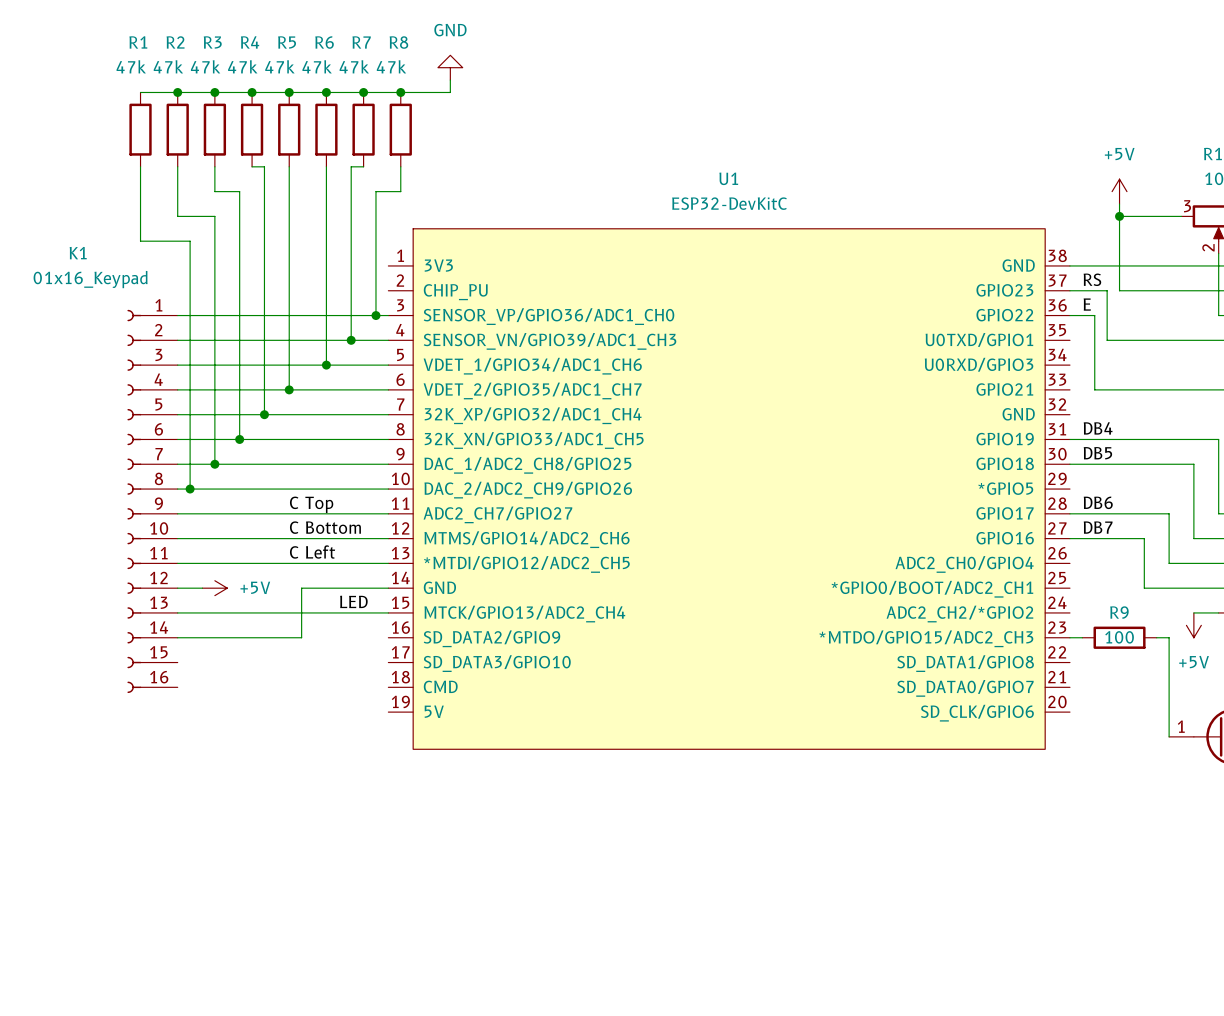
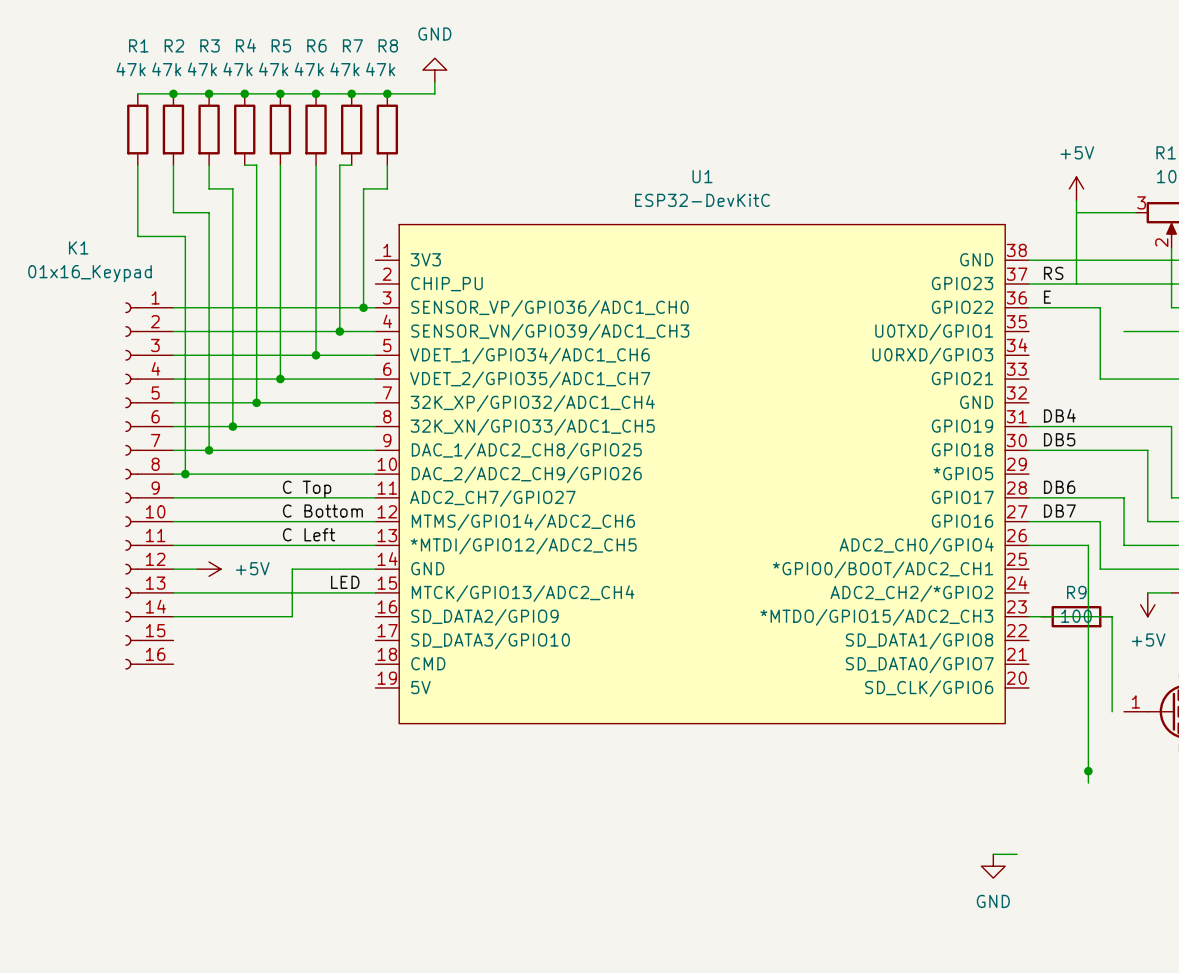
junction: (1119, 216) -> none
wire: (1107, 290) (1107, 340) (1169, 340) -> (1064, 283) (1076, 283)
wire: (1094, 315) (1094, 389) (1144, 389) -> (1052, 307) (1100, 307) (1100, 379)
wire: none -> (1028, 545) (1088, 545) (1088, 783)
wire: none -> (1040, 616) (1112, 616) (1112, 711)
wire: (1156, 637) (1169, 637) (1169, 736) -> none
junction: none -> (1088, 771)
wire: none -> (993, 854) (1017, 854)
power symbol: none -> GND (993, 866)

